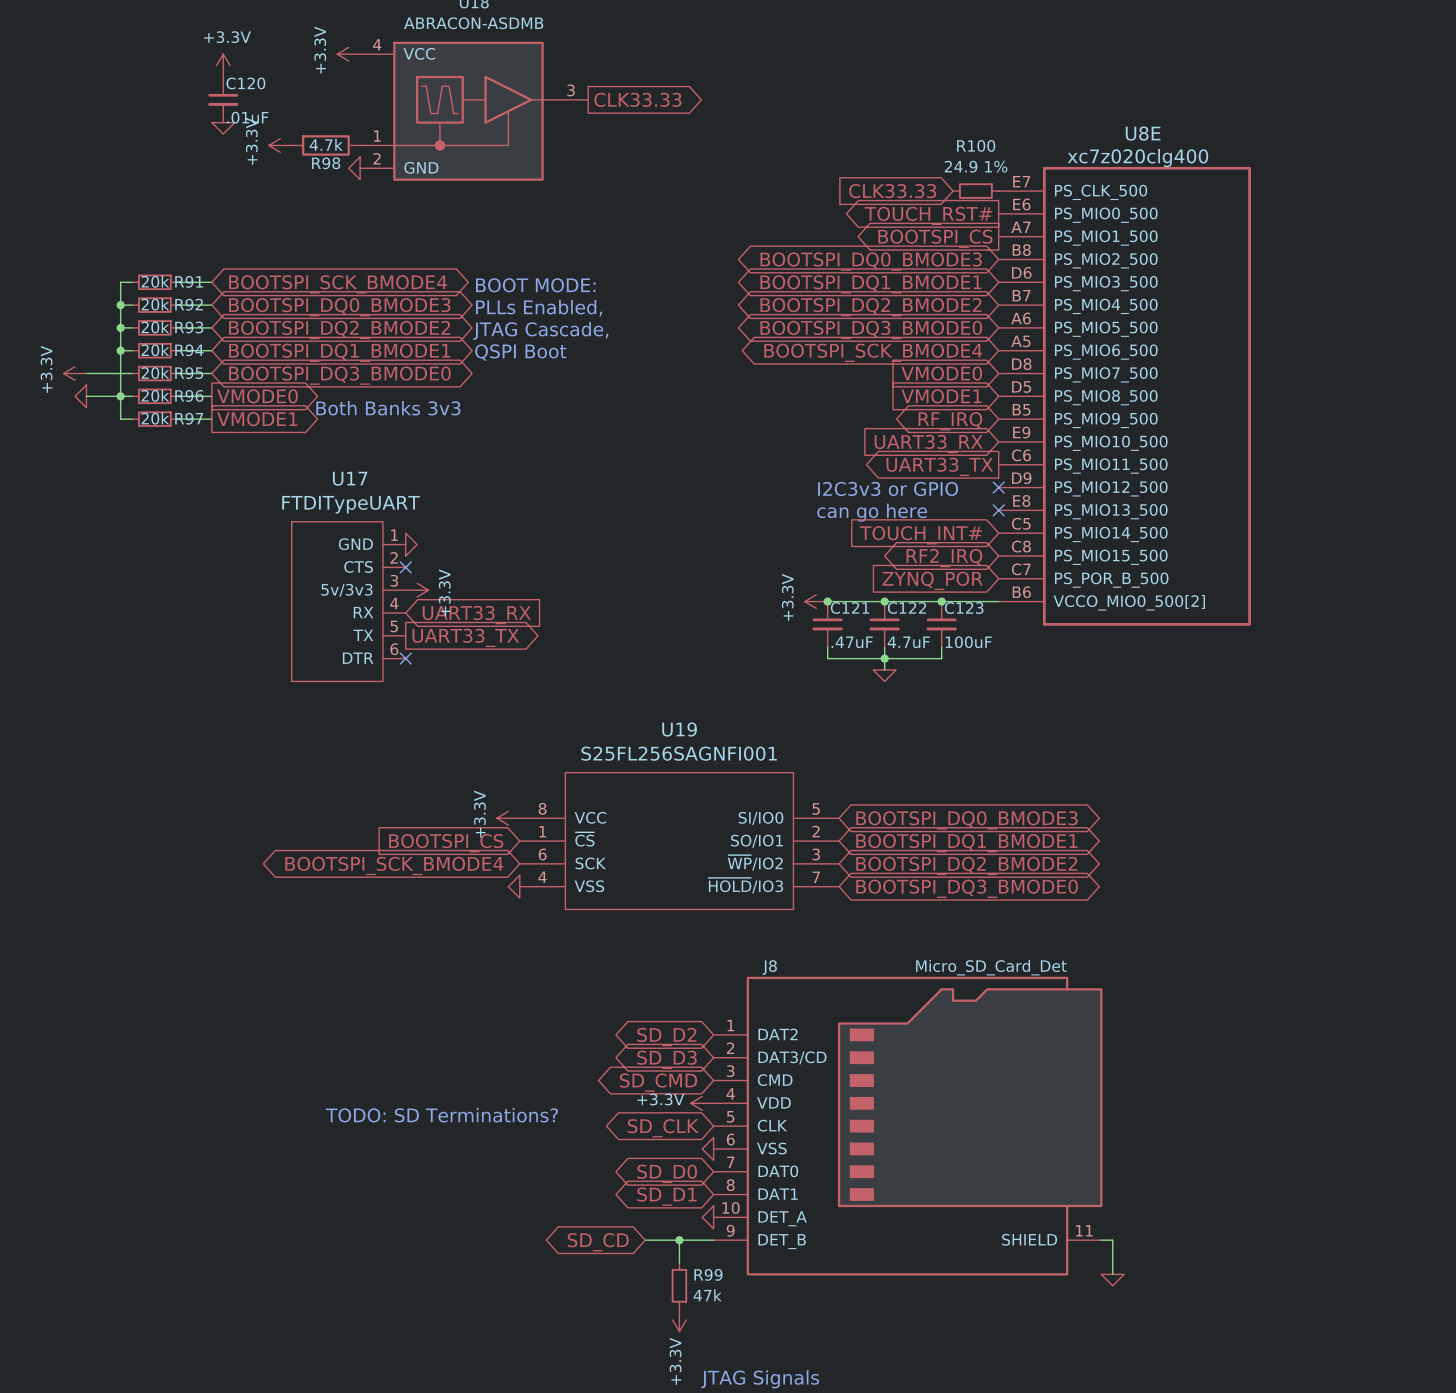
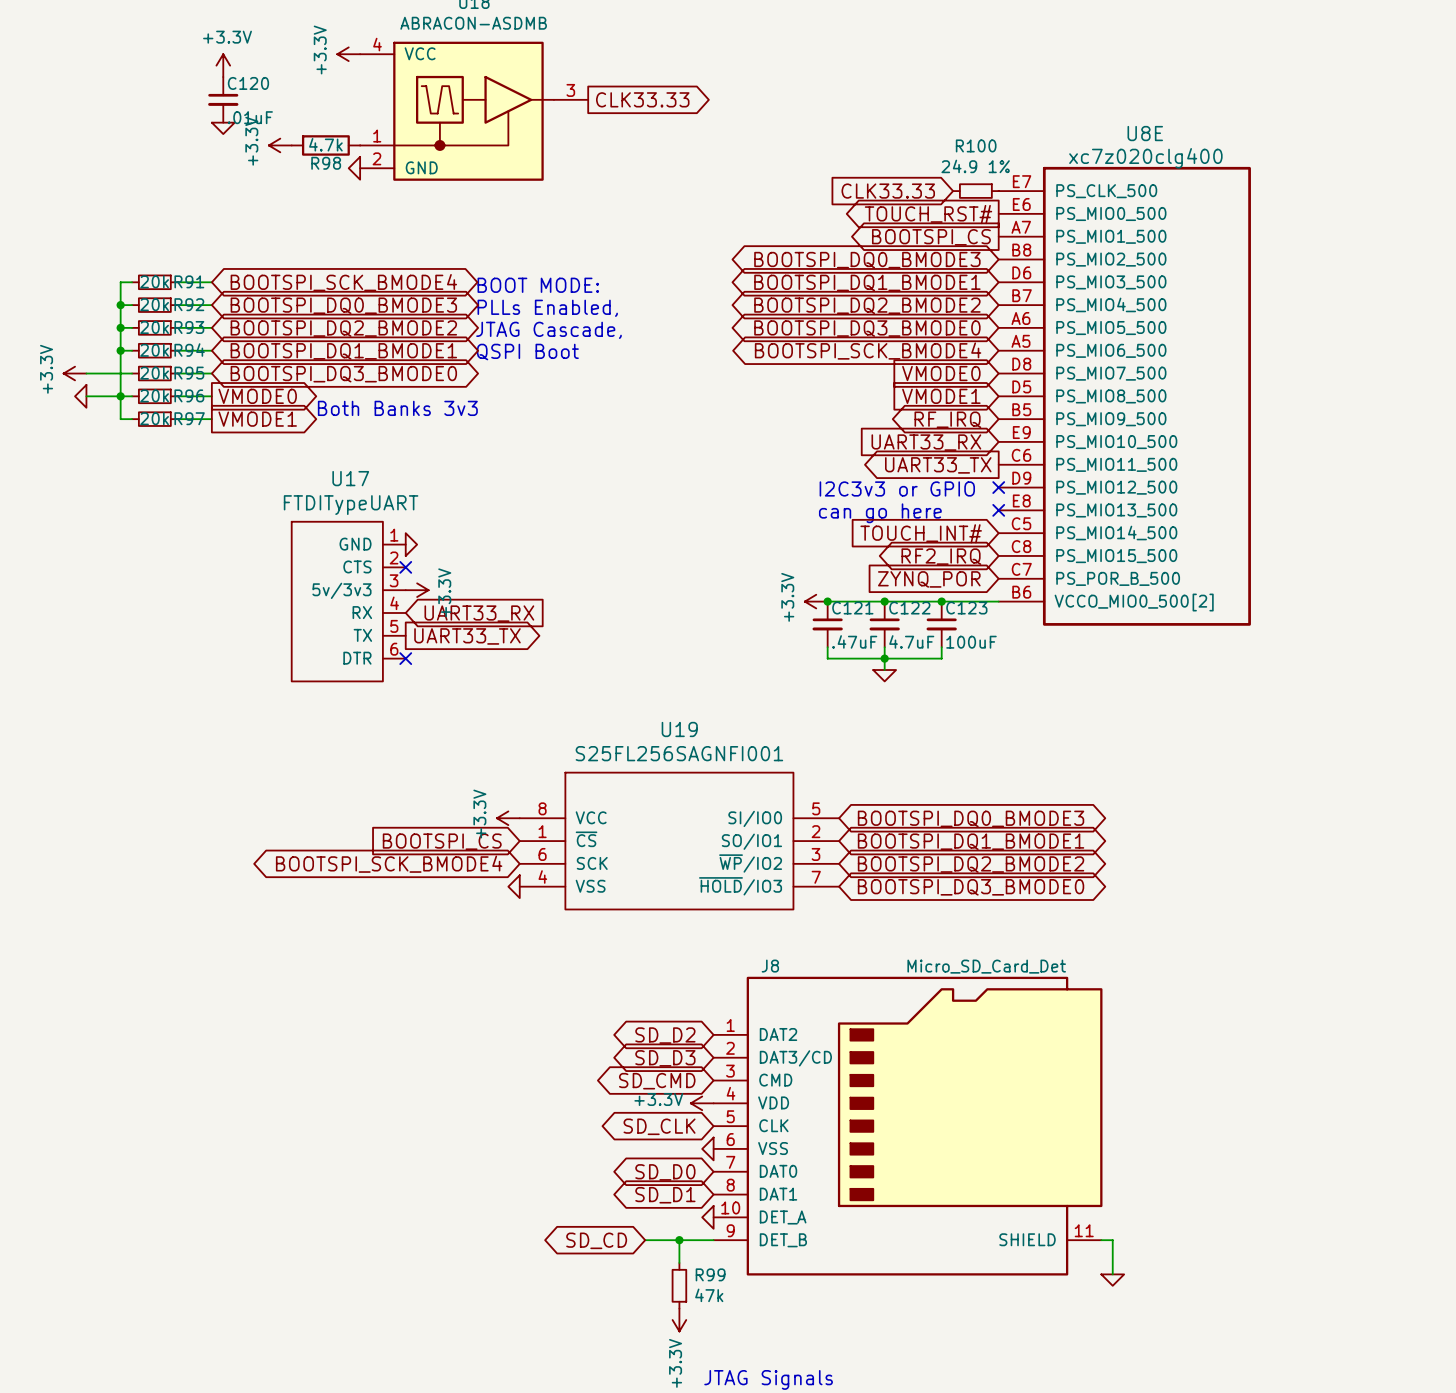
text: TODO: SD Terminations? (441, 1115) -> none

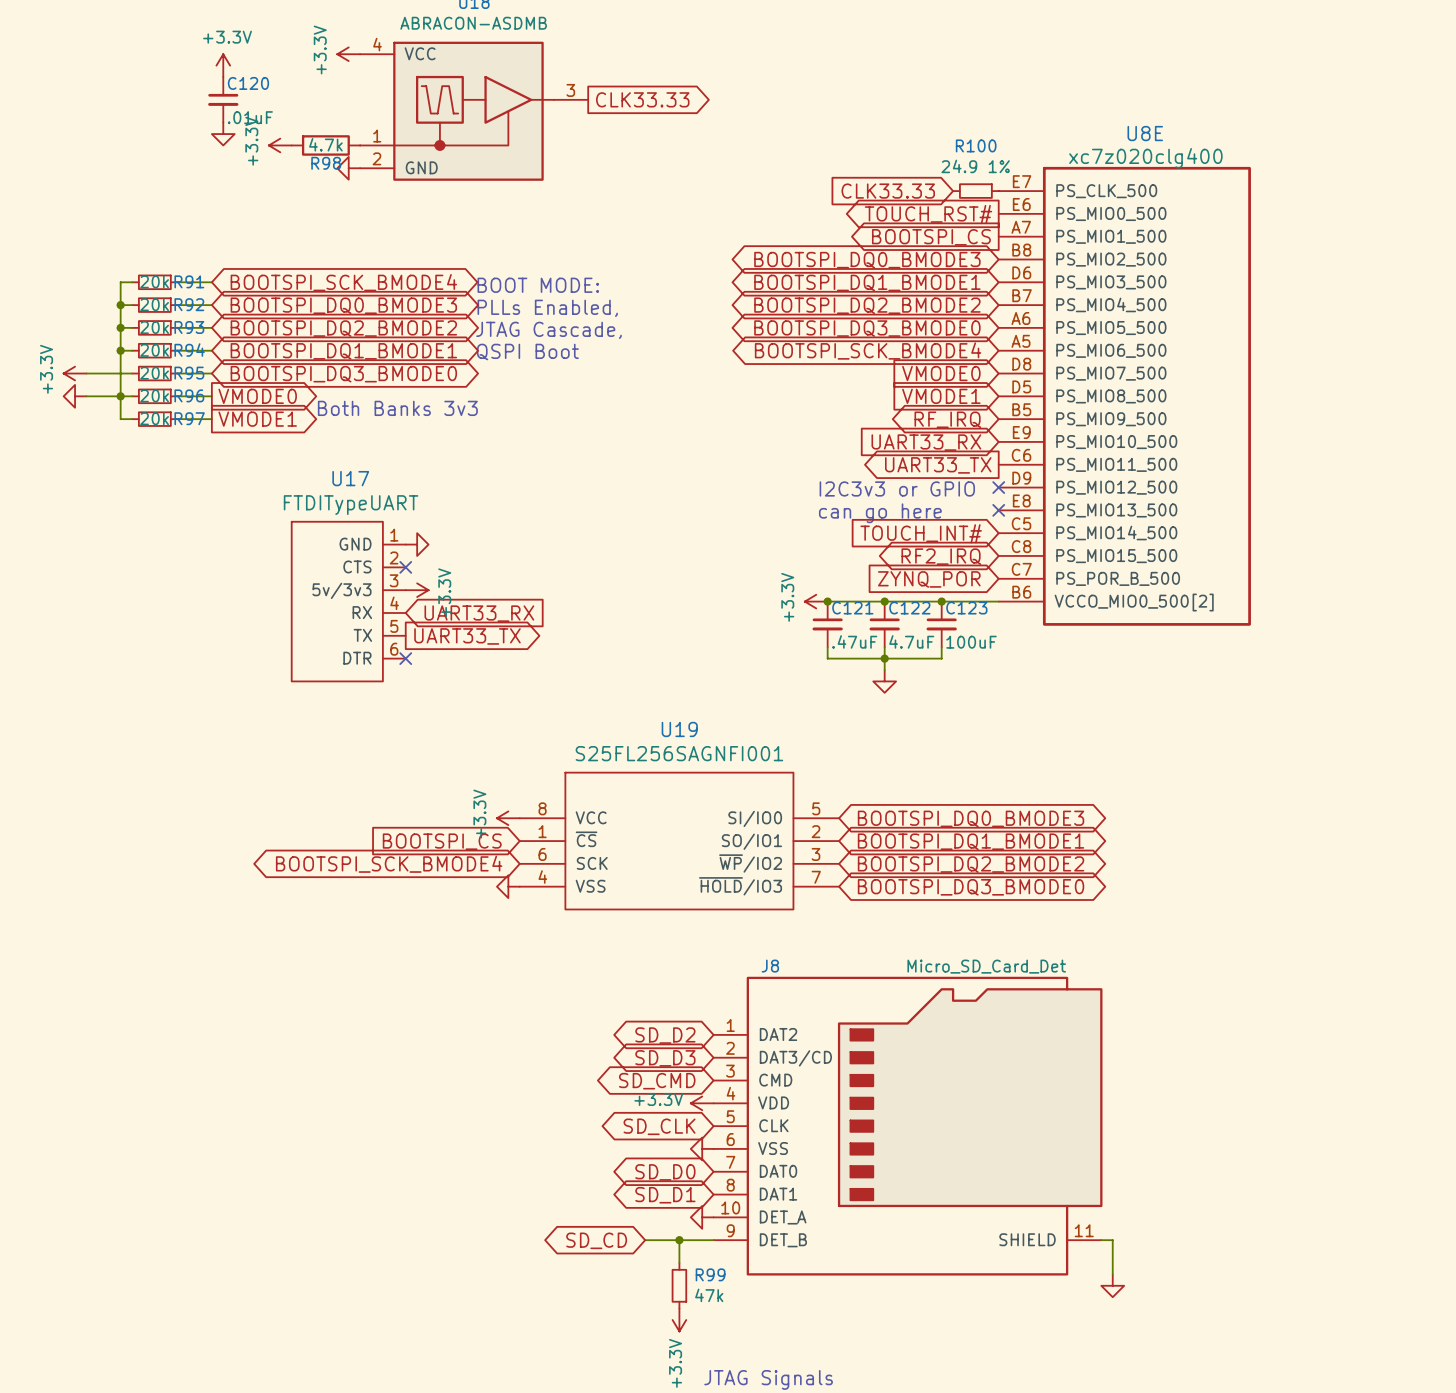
power symbol shape: [211, 122, 235, 135] -> [211, 122, 235, 146]
power symbol shape: [348, 156, 361, 180] -> [337, 156, 361, 180]
power symbol shape: [75, 384, 87, 408] -> [63, 384, 87, 408]
power symbol shape: [405, 533, 418, 556] -> [405, 533, 429, 556]
power symbol shape: [873, 670, 897, 682] -> [873, 670, 897, 693]
power symbol shape: [508, 875, 520, 899] -> [496, 875, 520, 899]
power symbol shape: [702, 1137, 714, 1161] -> [690, 1137, 714, 1161]
power symbol shape: [702, 1205, 714, 1229] -> [690, 1205, 714, 1229]
power symbol shape: [1101, 1274, 1125, 1286] -> [1101, 1274, 1125, 1298]

